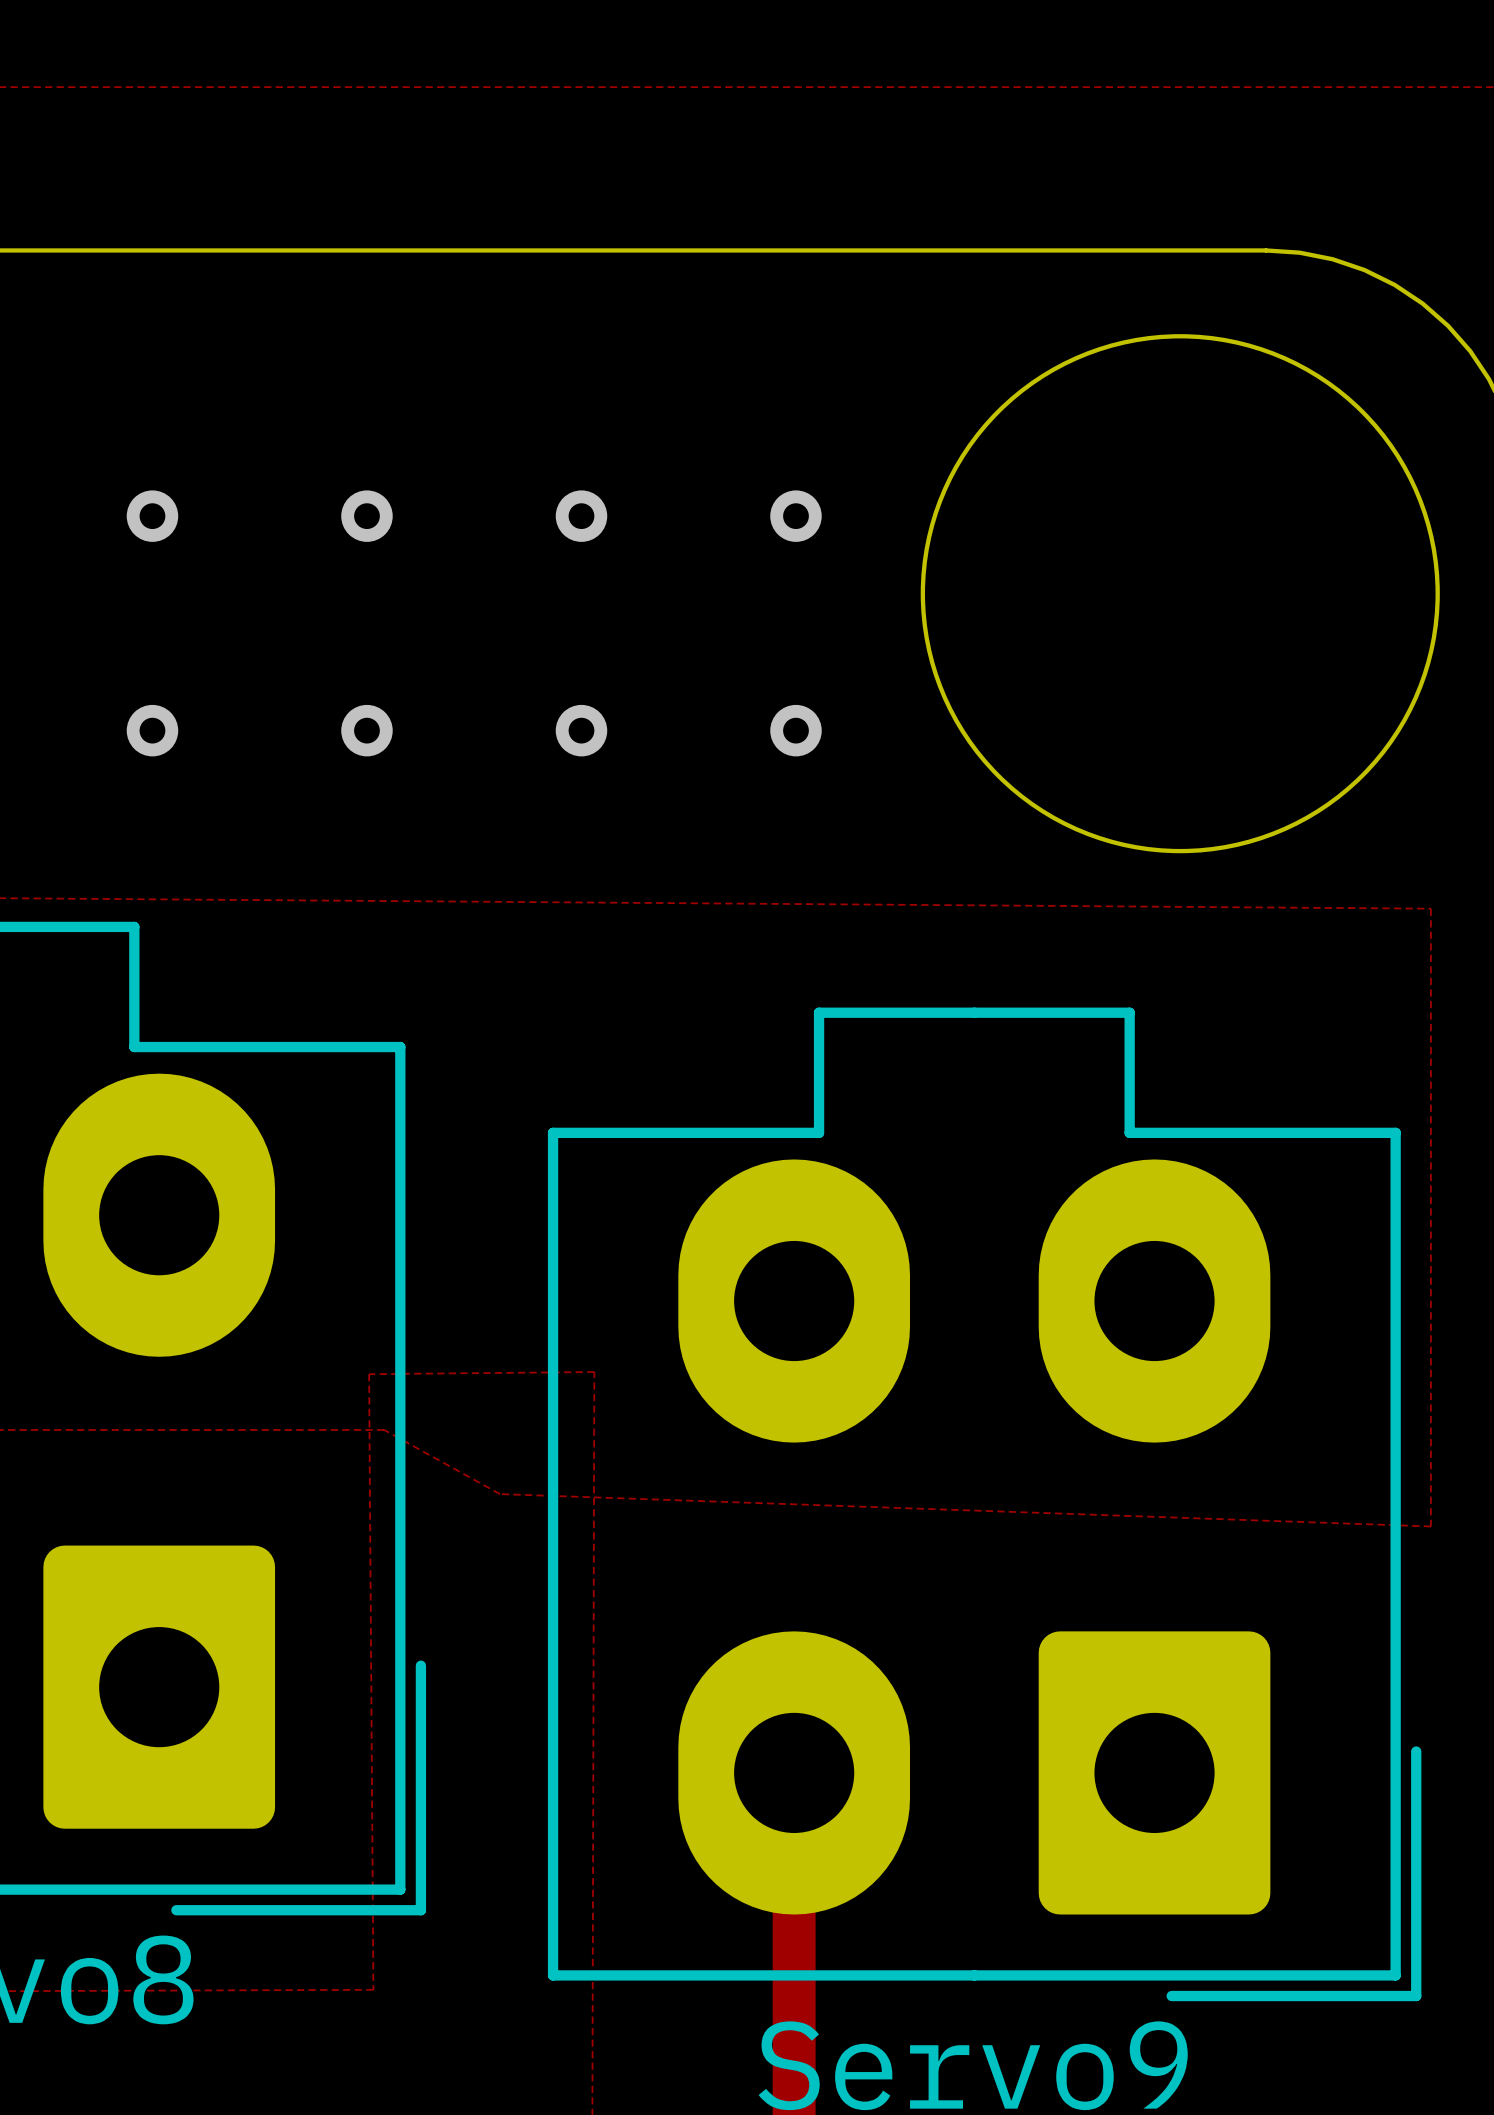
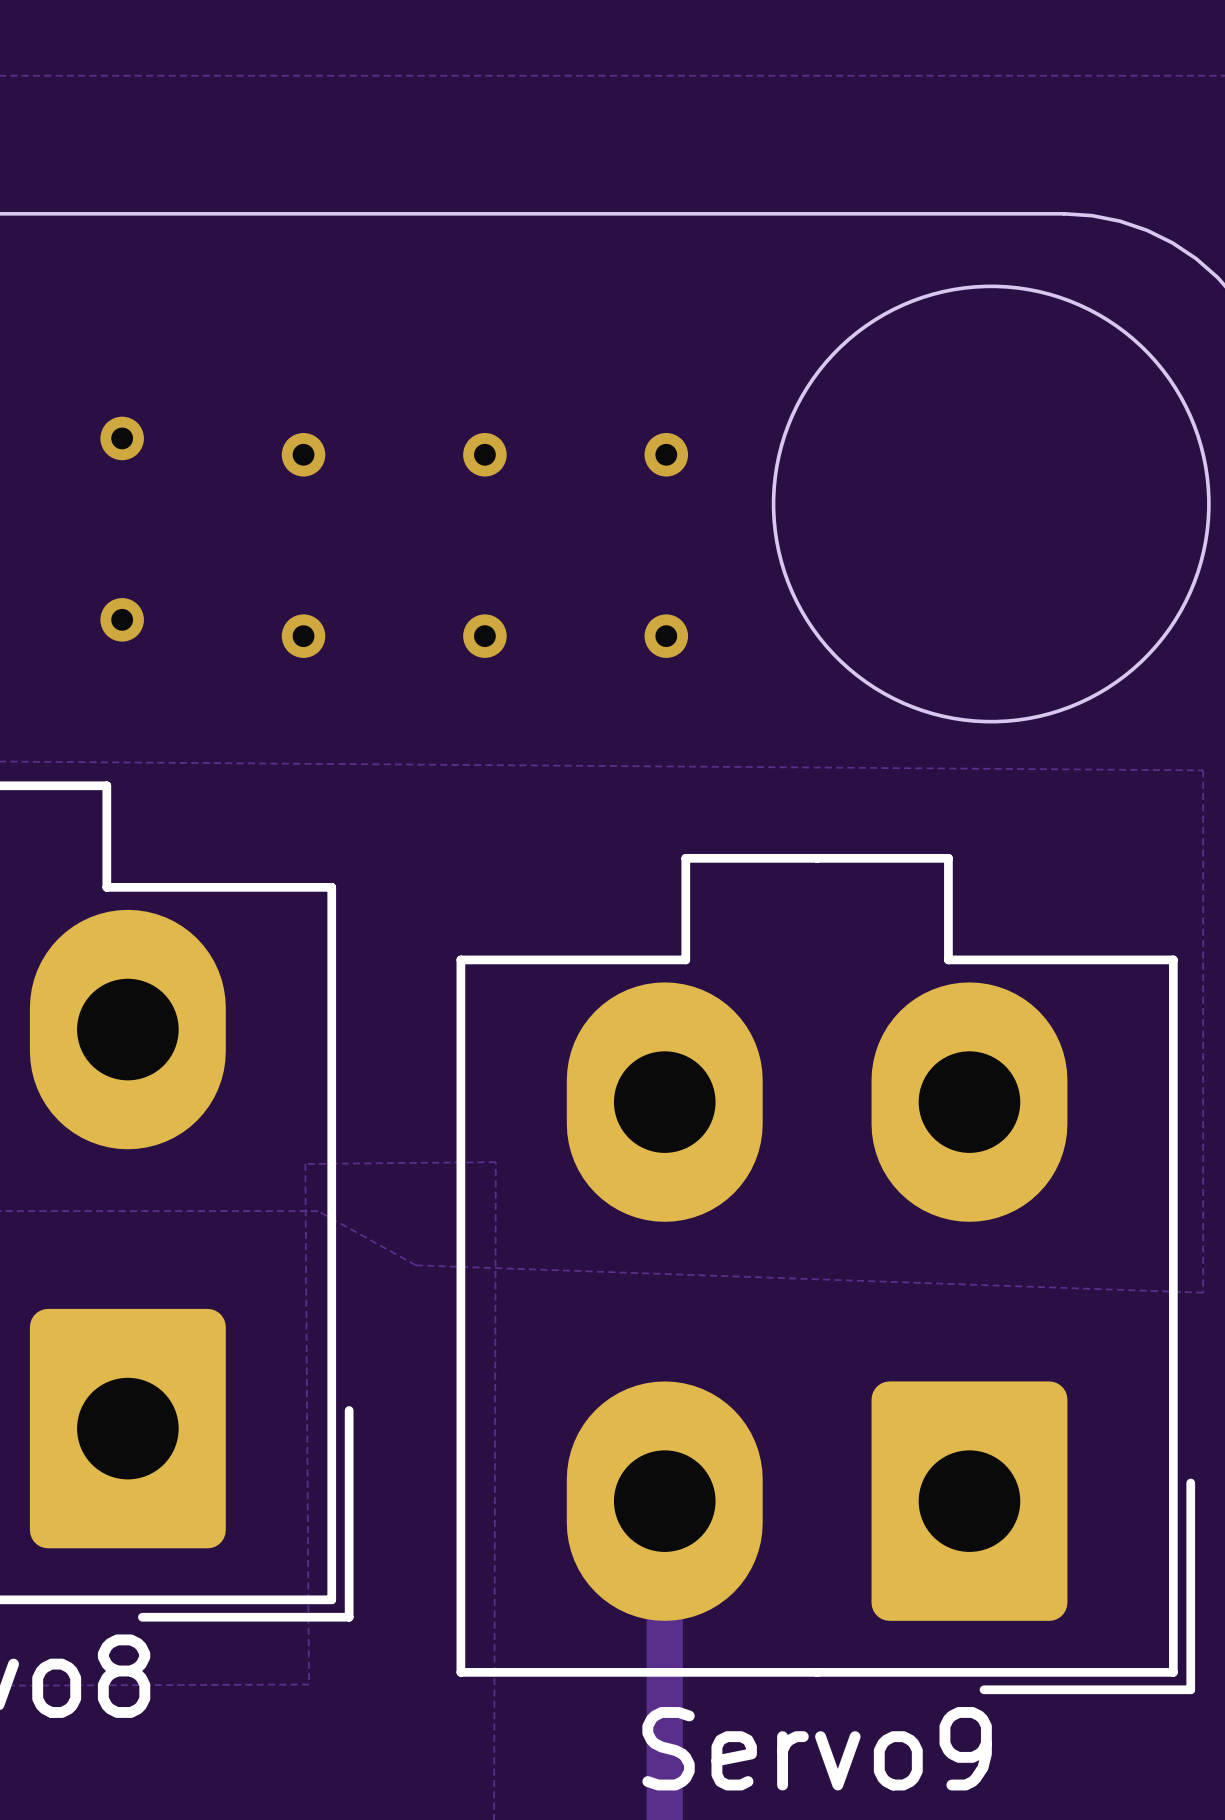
via position: (366, 516) -> (303, 454)
via position: (581, 516) -> (484, 454)
via position: (795, 516) -> (666, 454)
via position: (366, 730) -> (303, 636)
via position: (581, 730) -> (484, 636)
via position: (795, 730) -> (666, 636)

